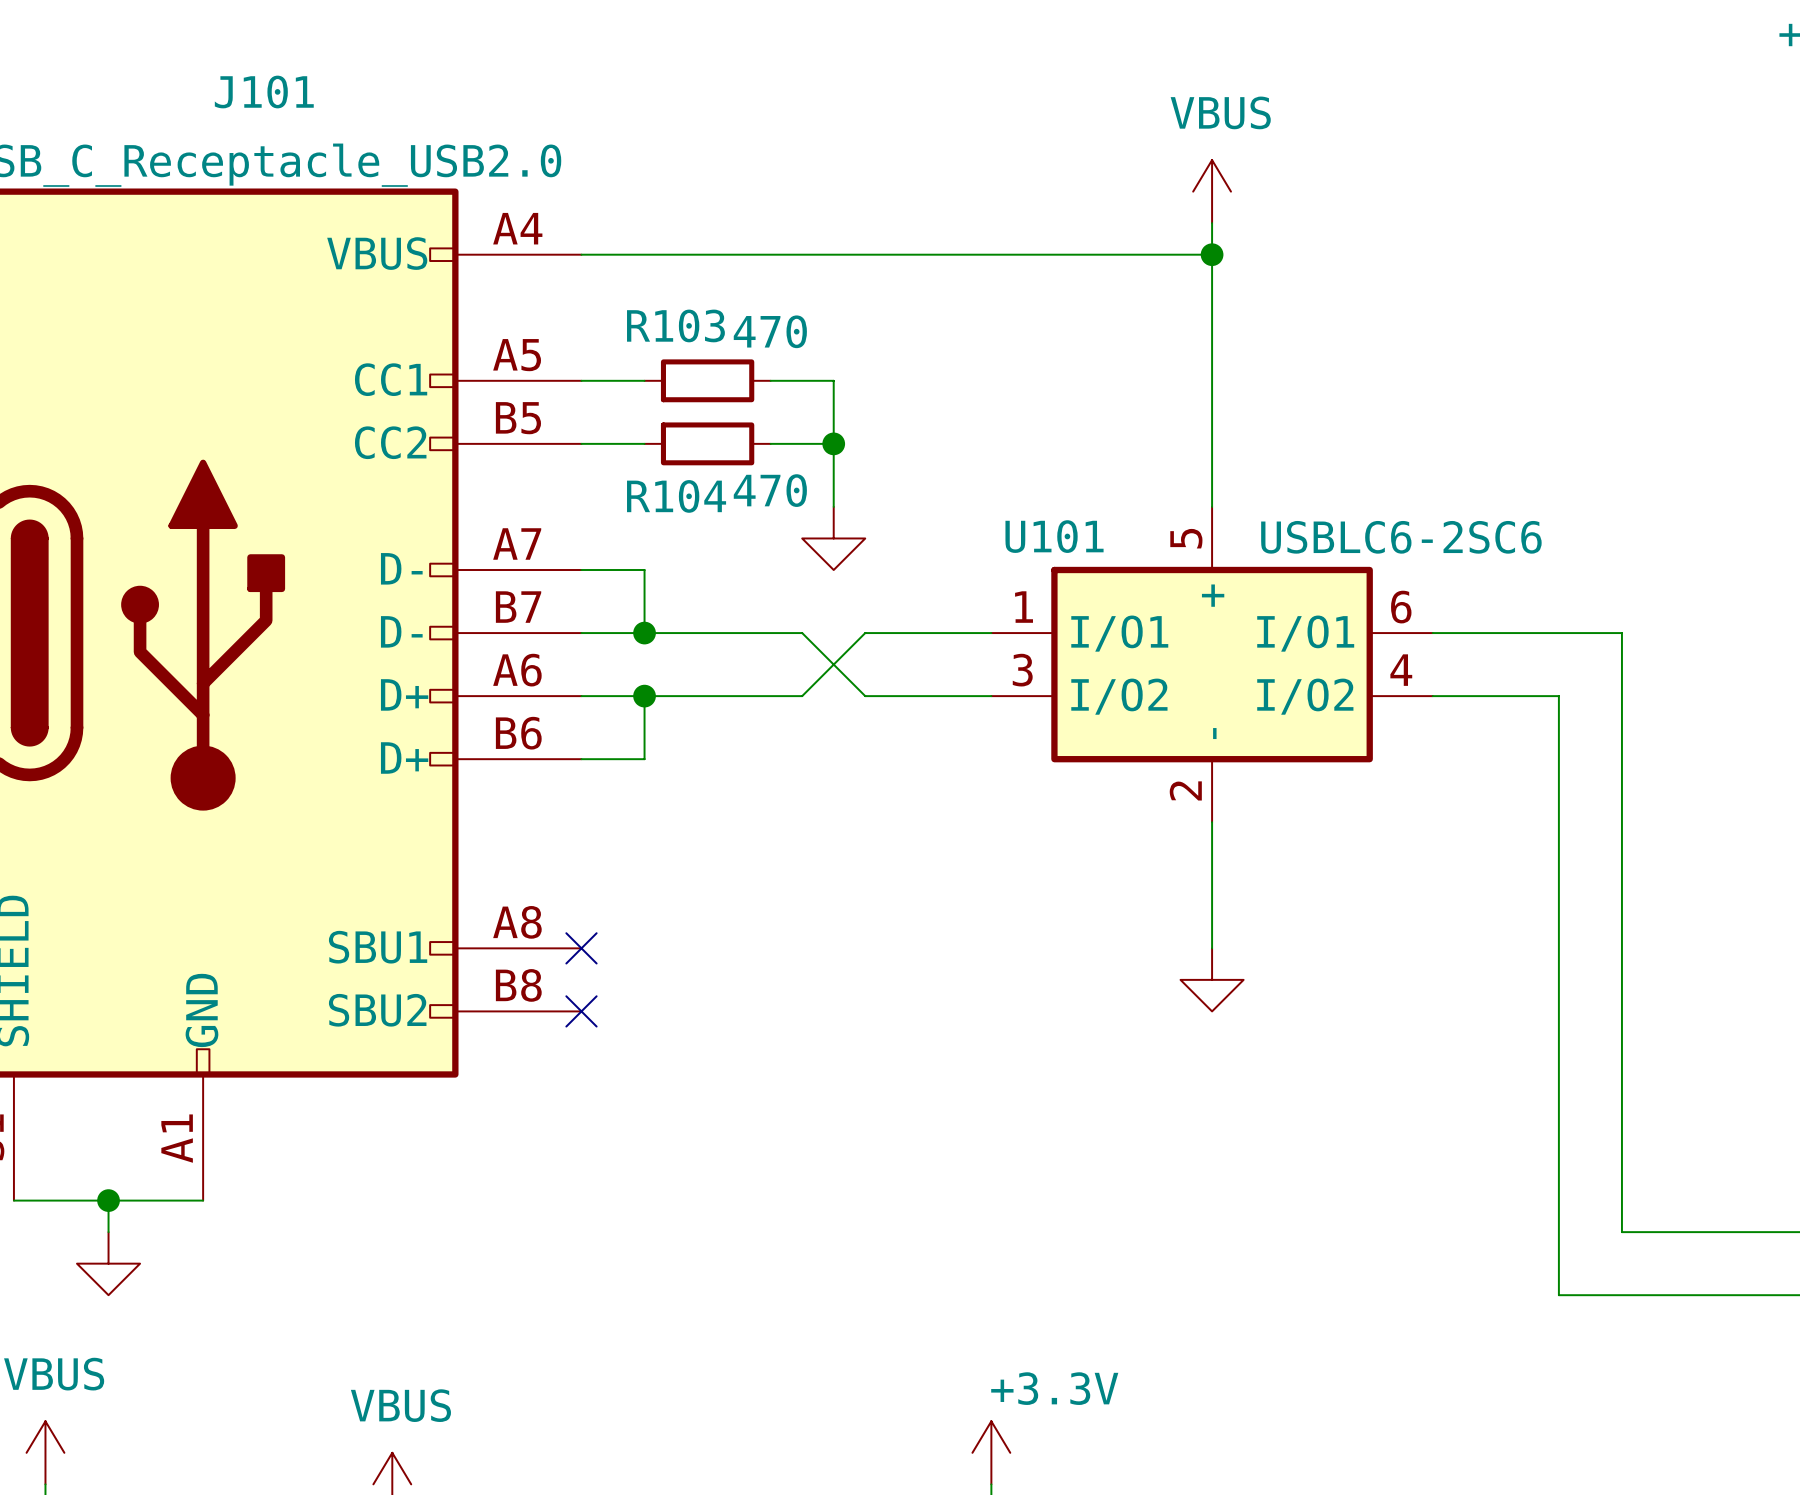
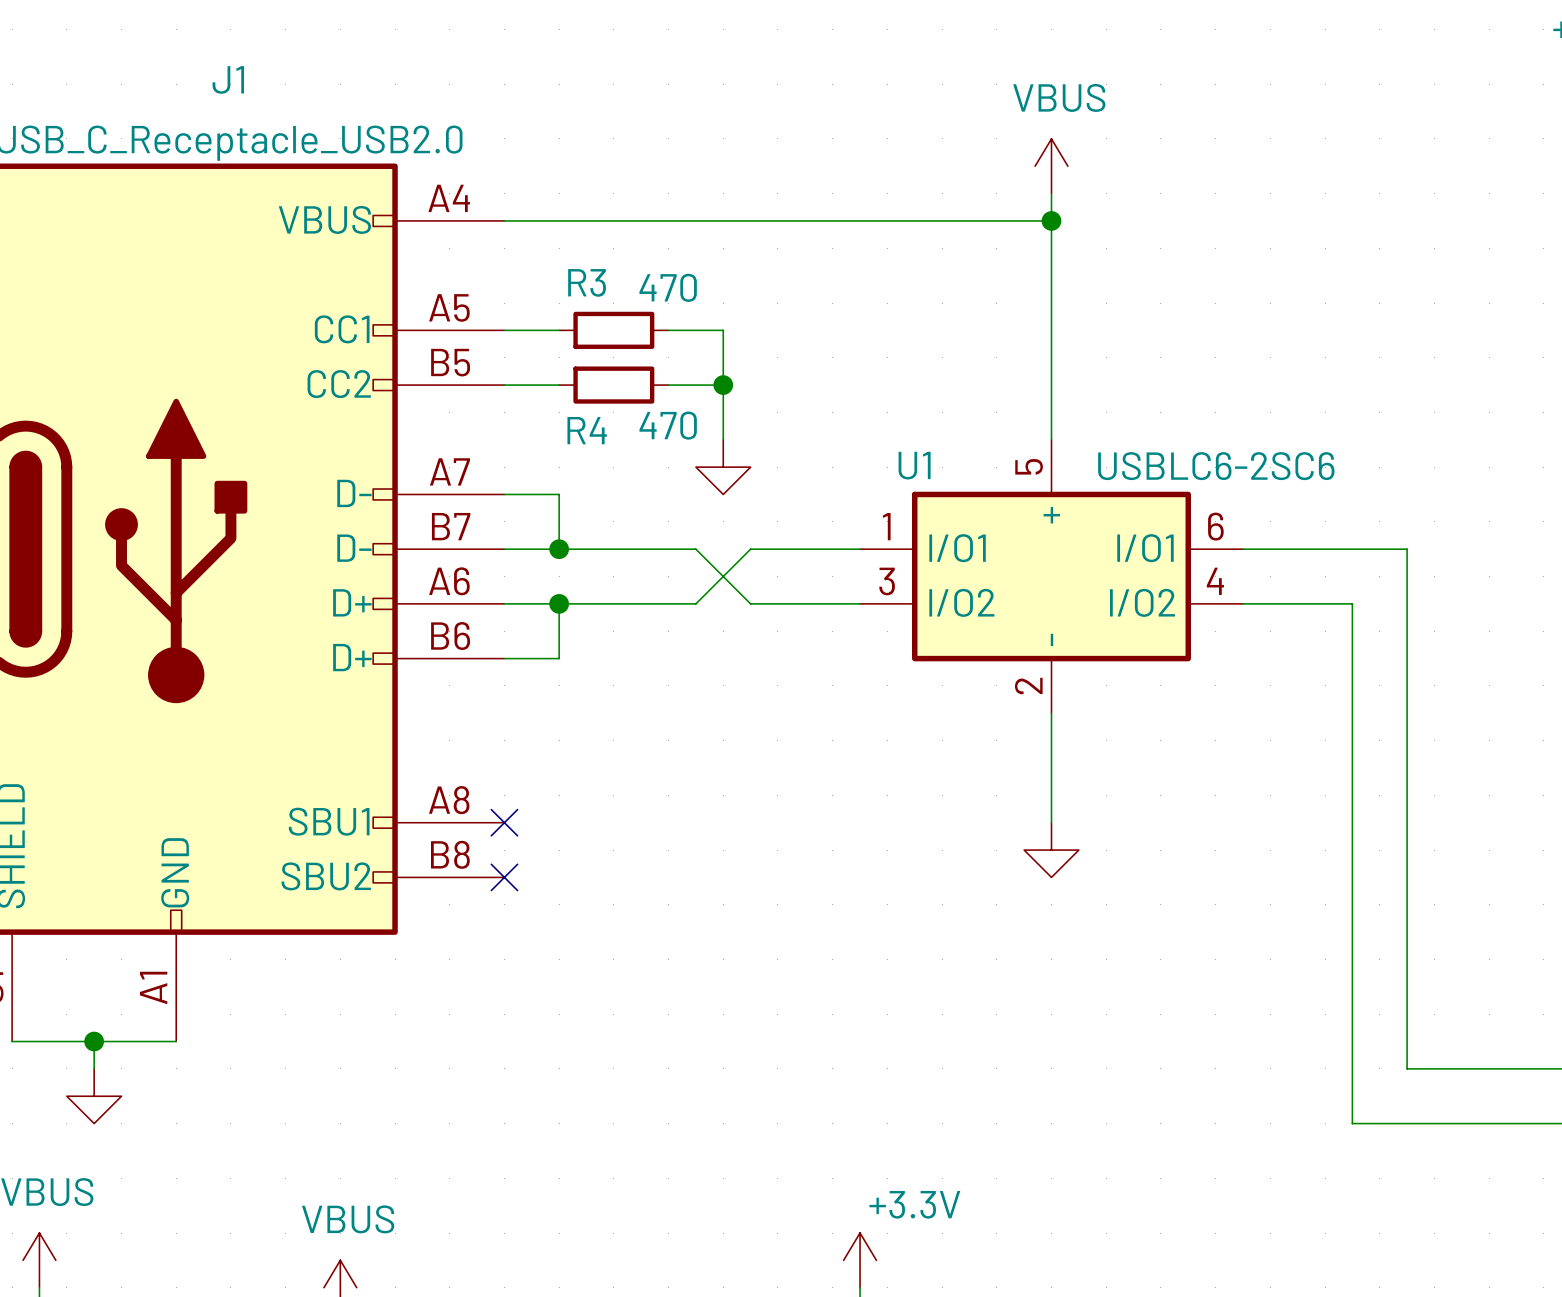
J101 name: J101 (264, 92) -> J1 (228, 79)
R103 name: R103 (675, 325) -> R3 (587, 282)
R104 name: R104 (676, 496) -> R4 (587, 430)
U101 name: U101 (1054, 536) -> U1 (914, 465)

